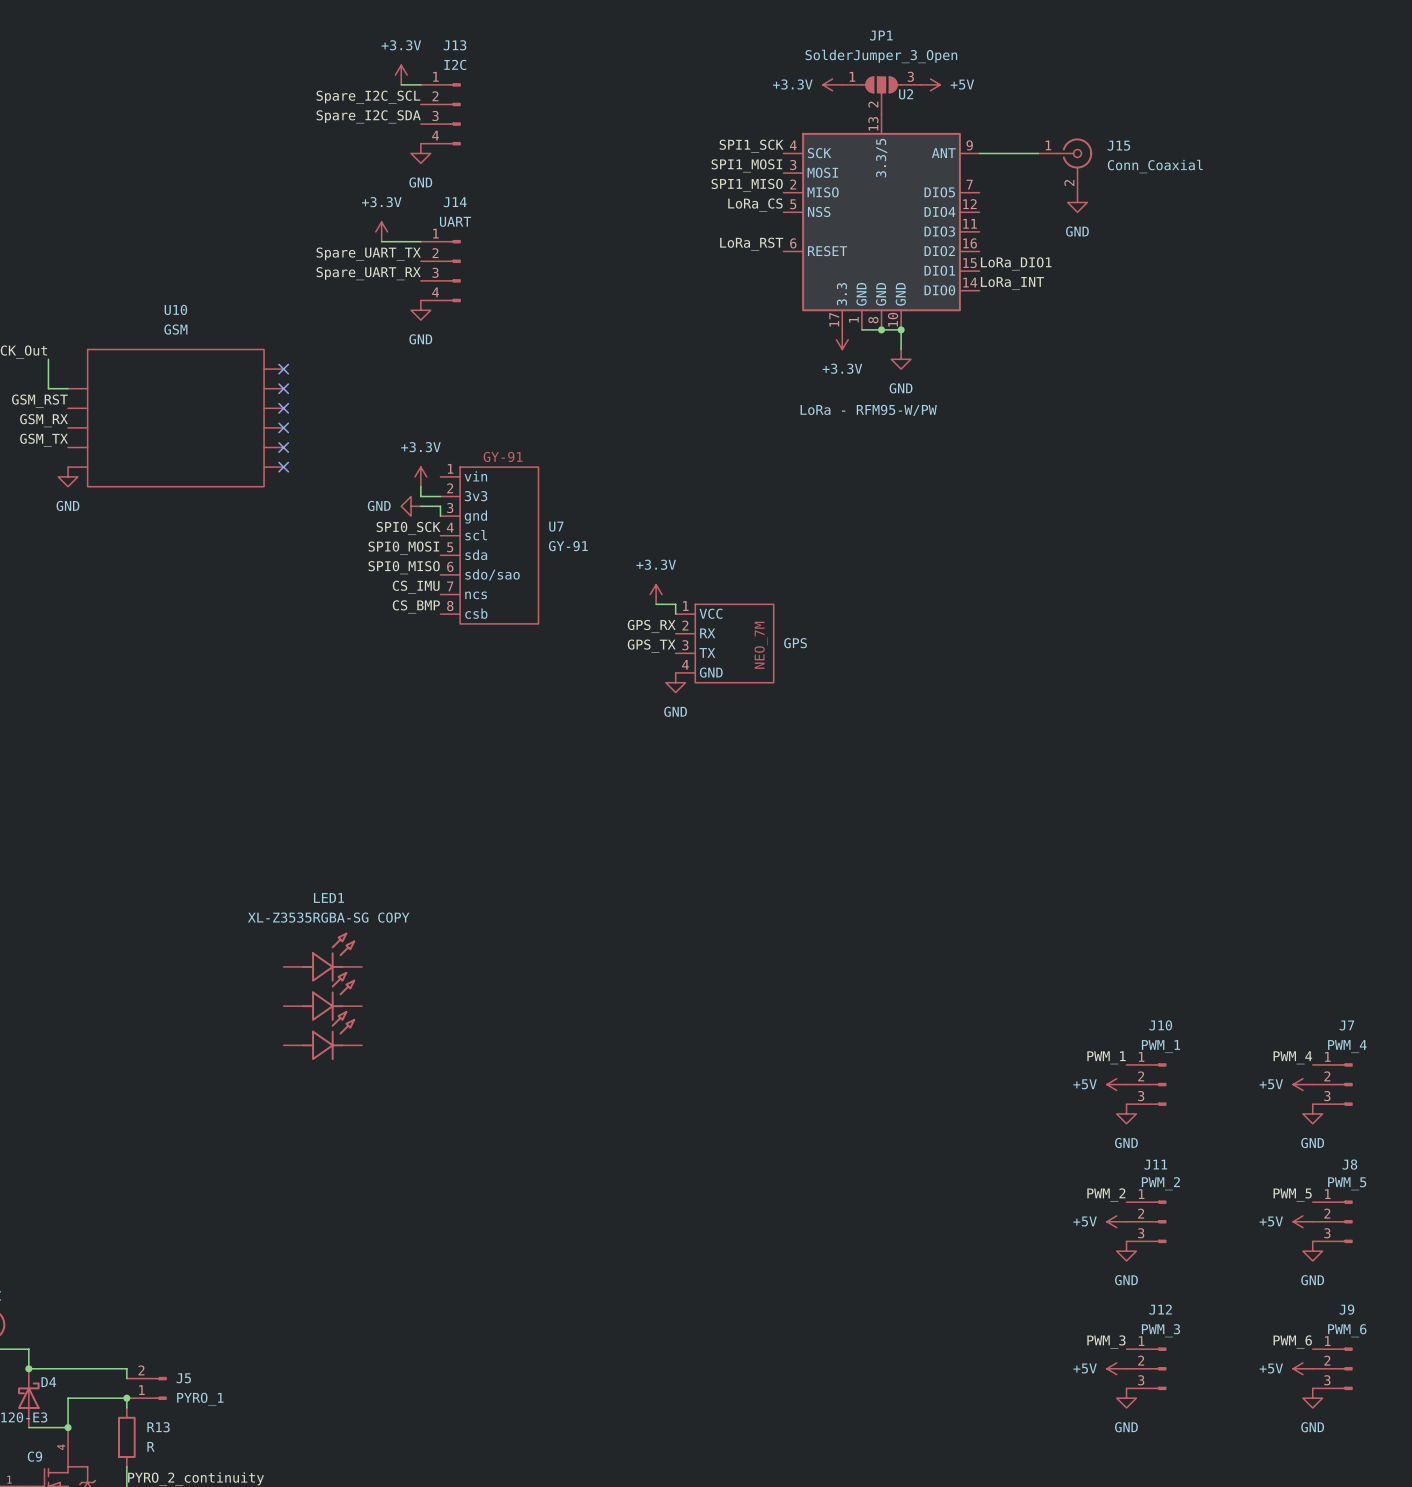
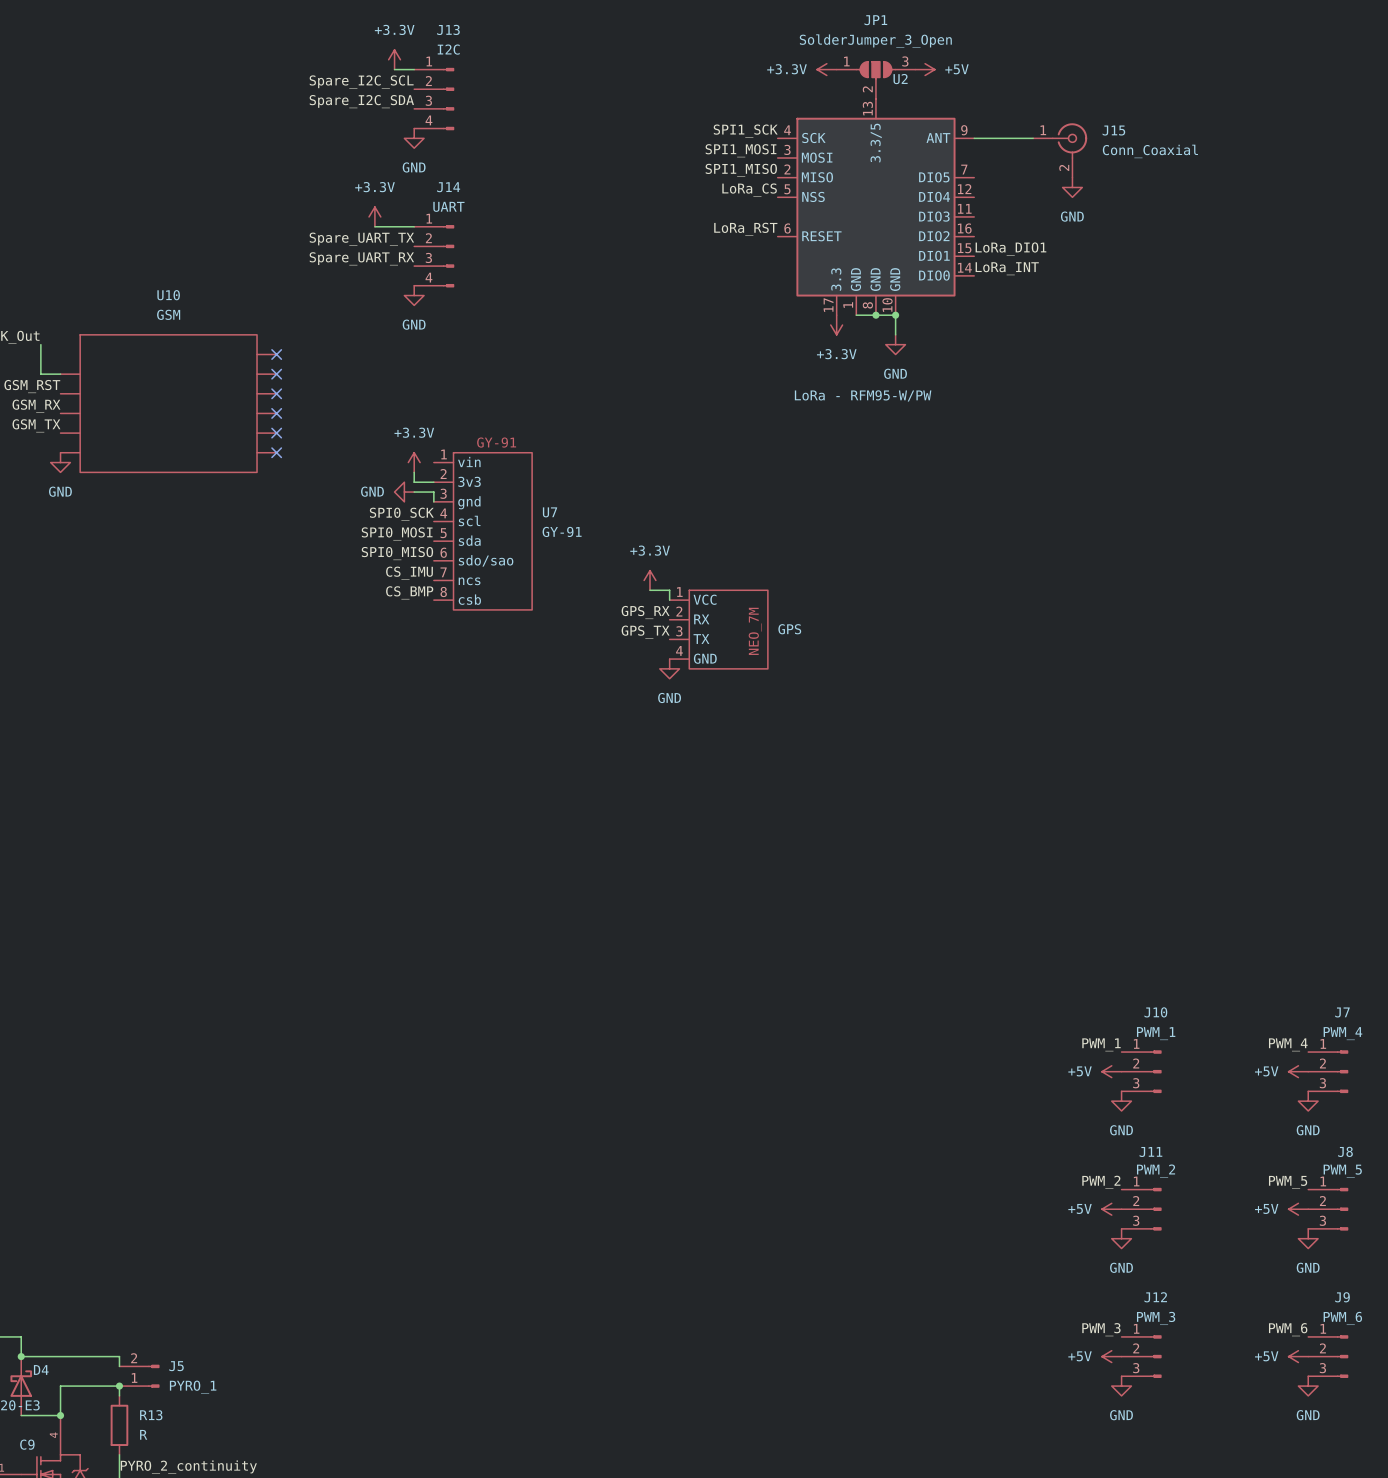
LED1: XL-Z3535RGBA-SG COPY (322, 996) -> none

